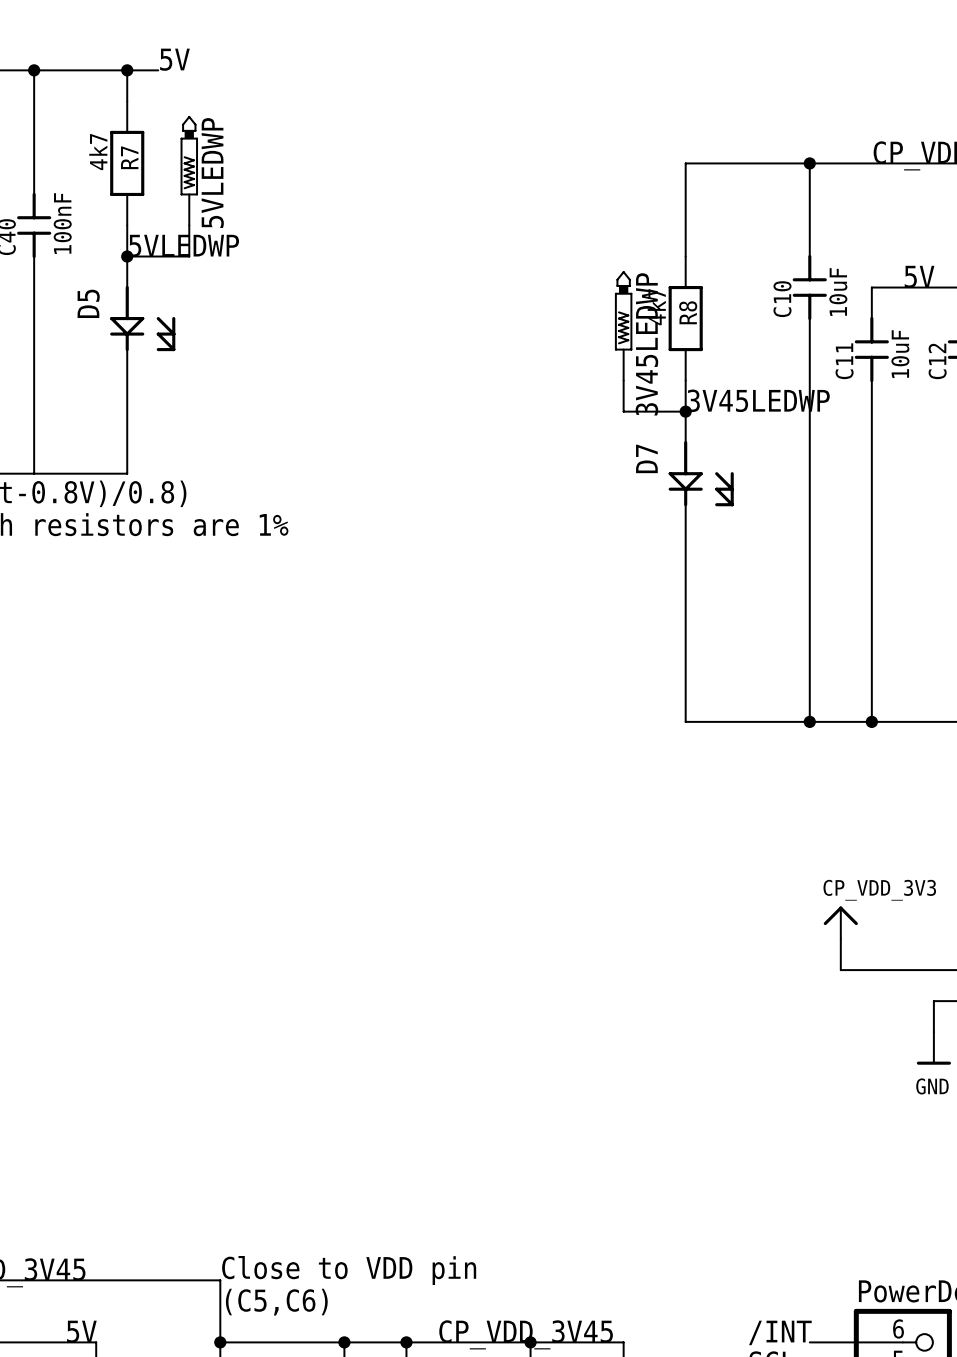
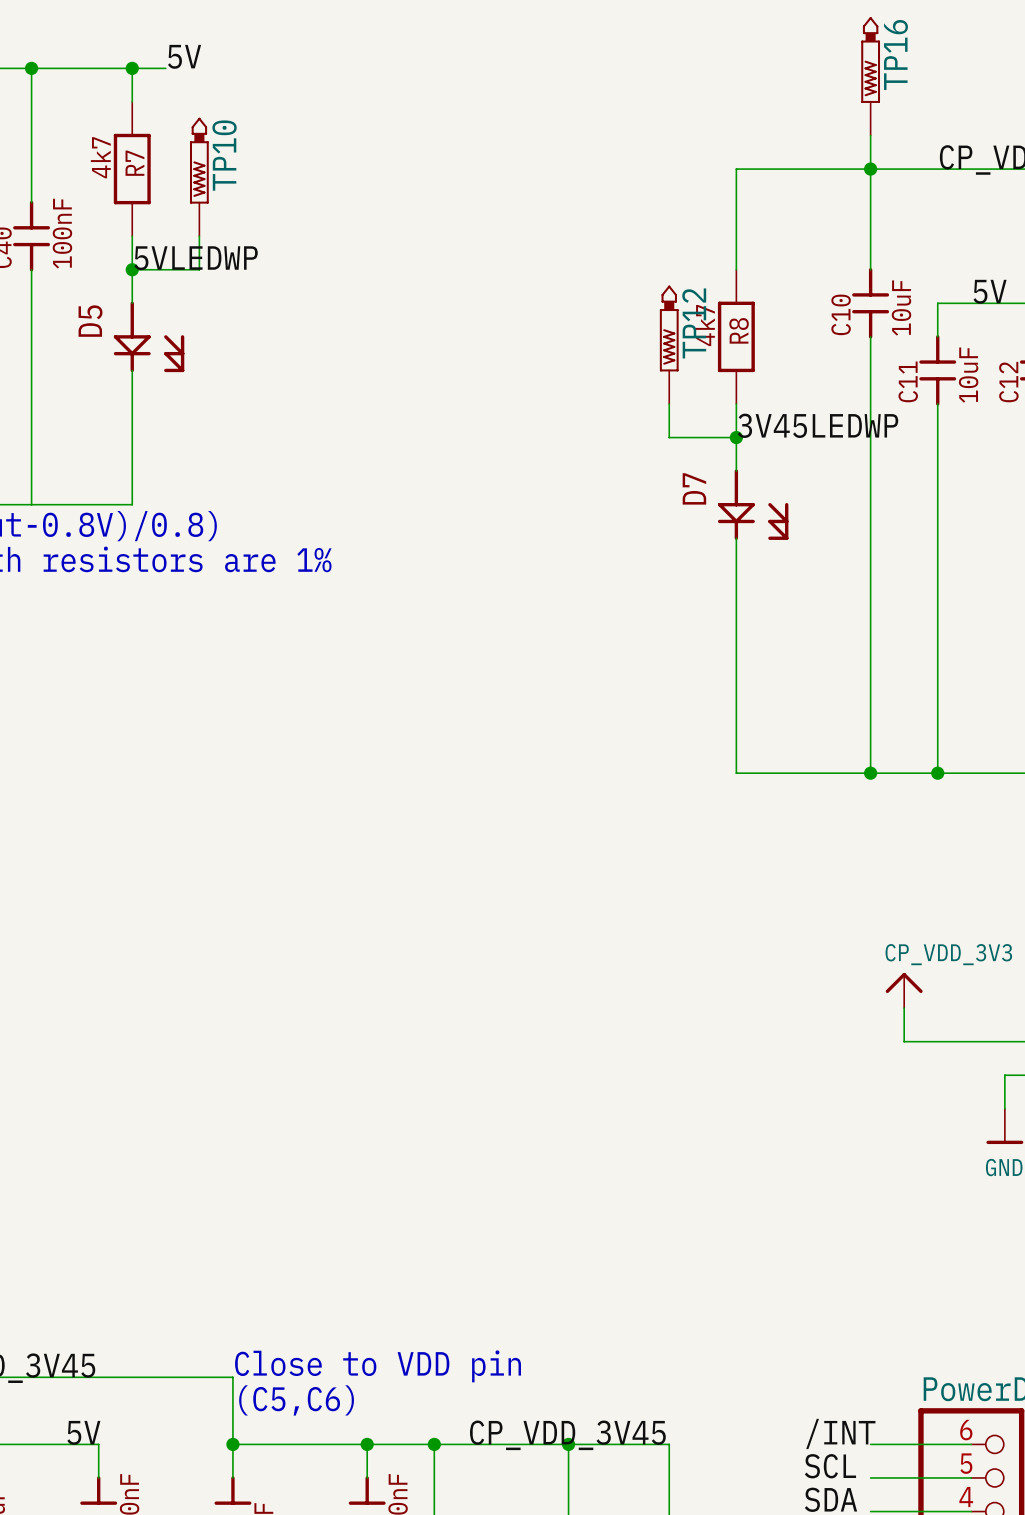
TP16: none -> (870, 76)
wire: none -> (870, 135) (870, 169)
5VLEDWP name: 5VLEDWP (212, 173) -> TP10 (224, 155)
3V45LEDWP name: 3V45LEDWP (646, 344) -> TP12 (694, 323)

